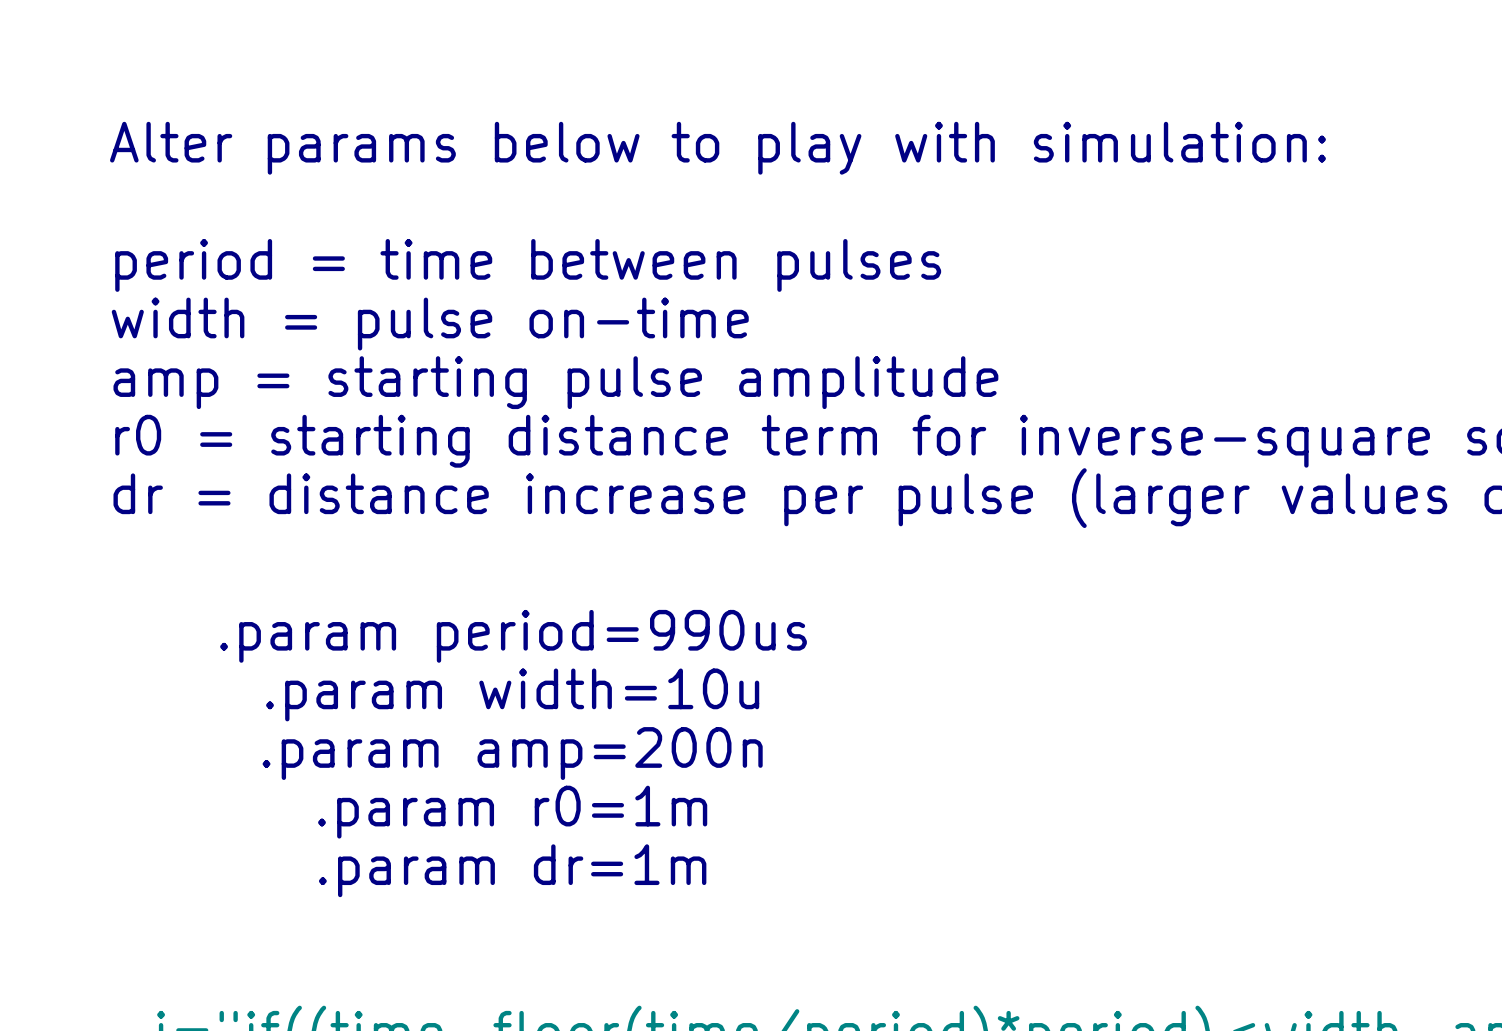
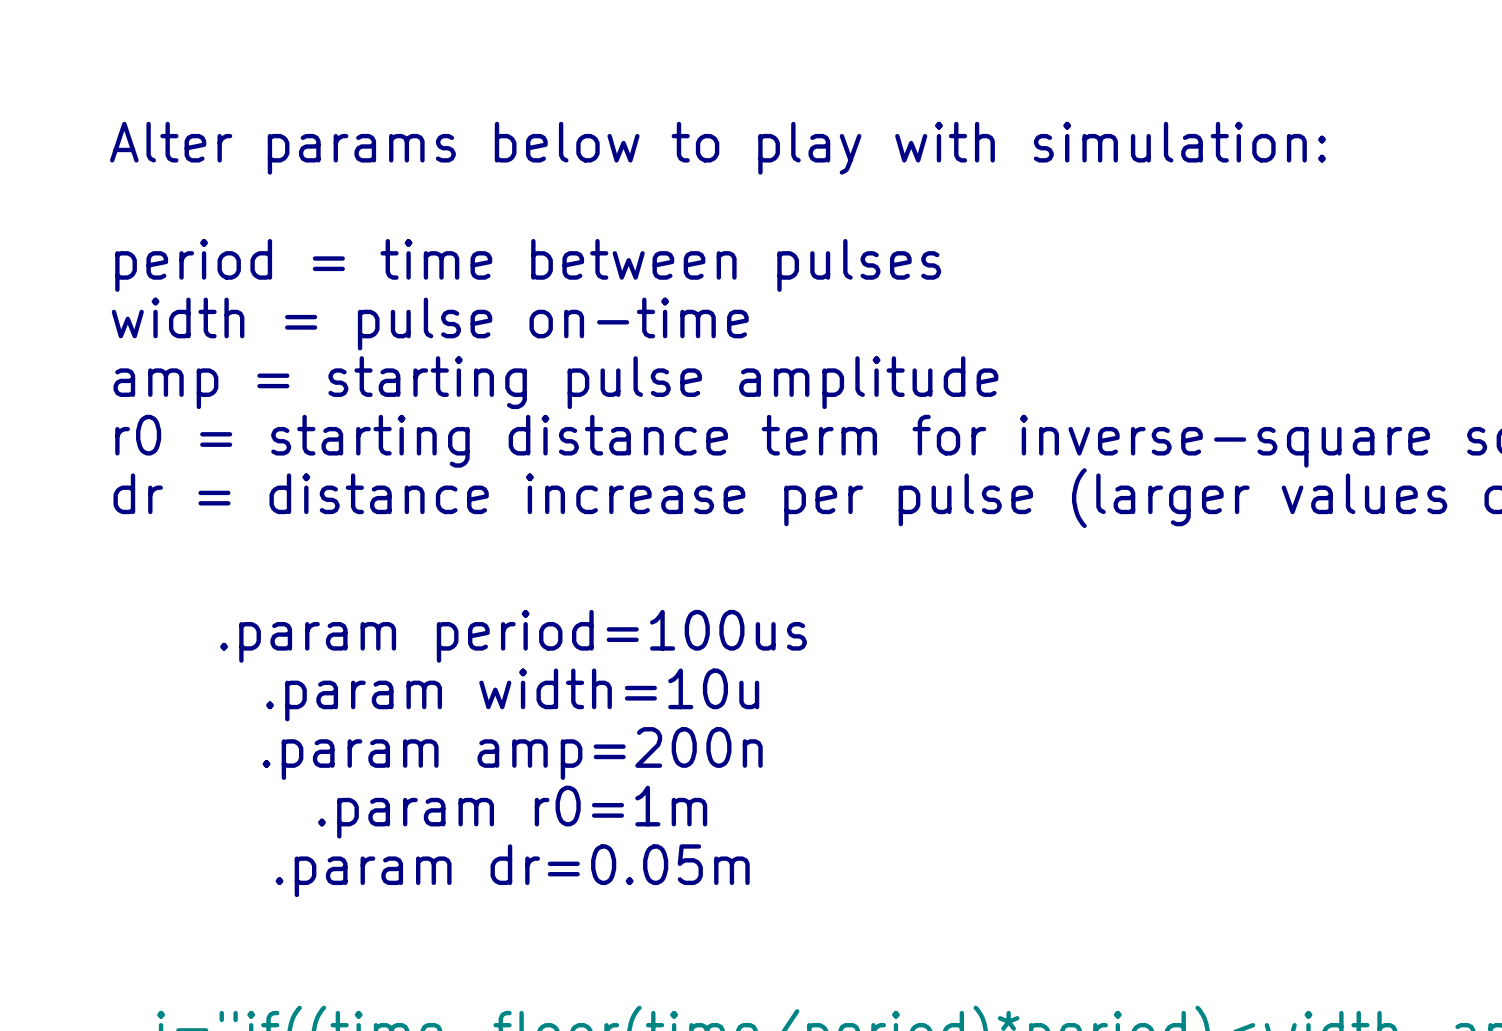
text: .param period=990us (513, 636) -> .param period=100us (513, 636)
text: .param dr=1m (512, 870) -> .param dr=0.05m (512, 870)

